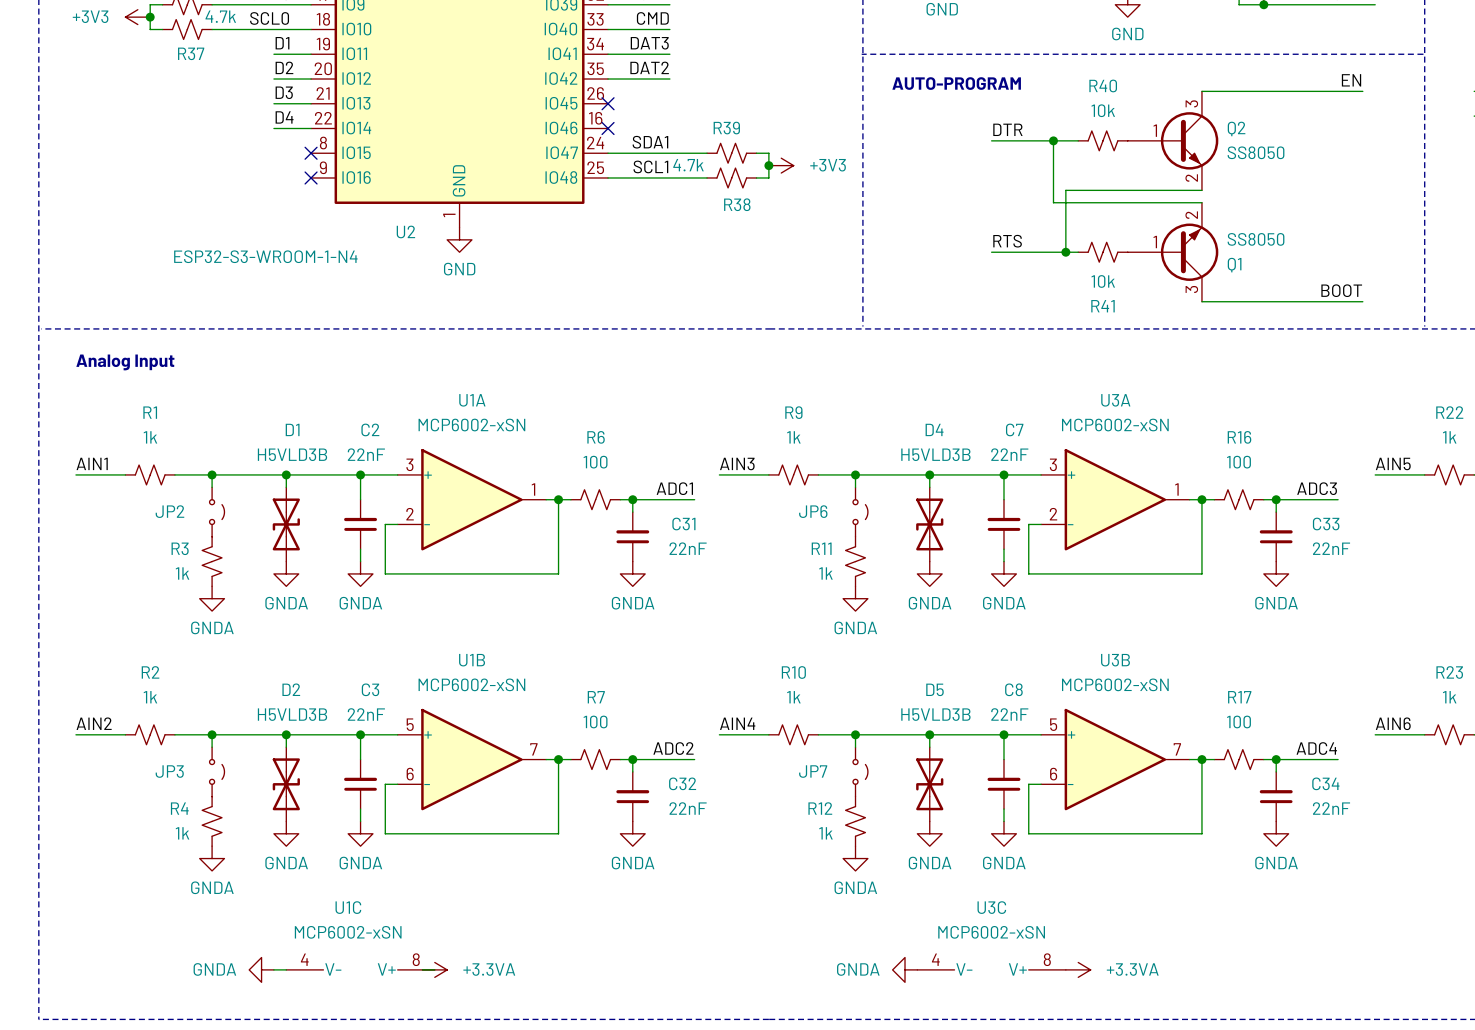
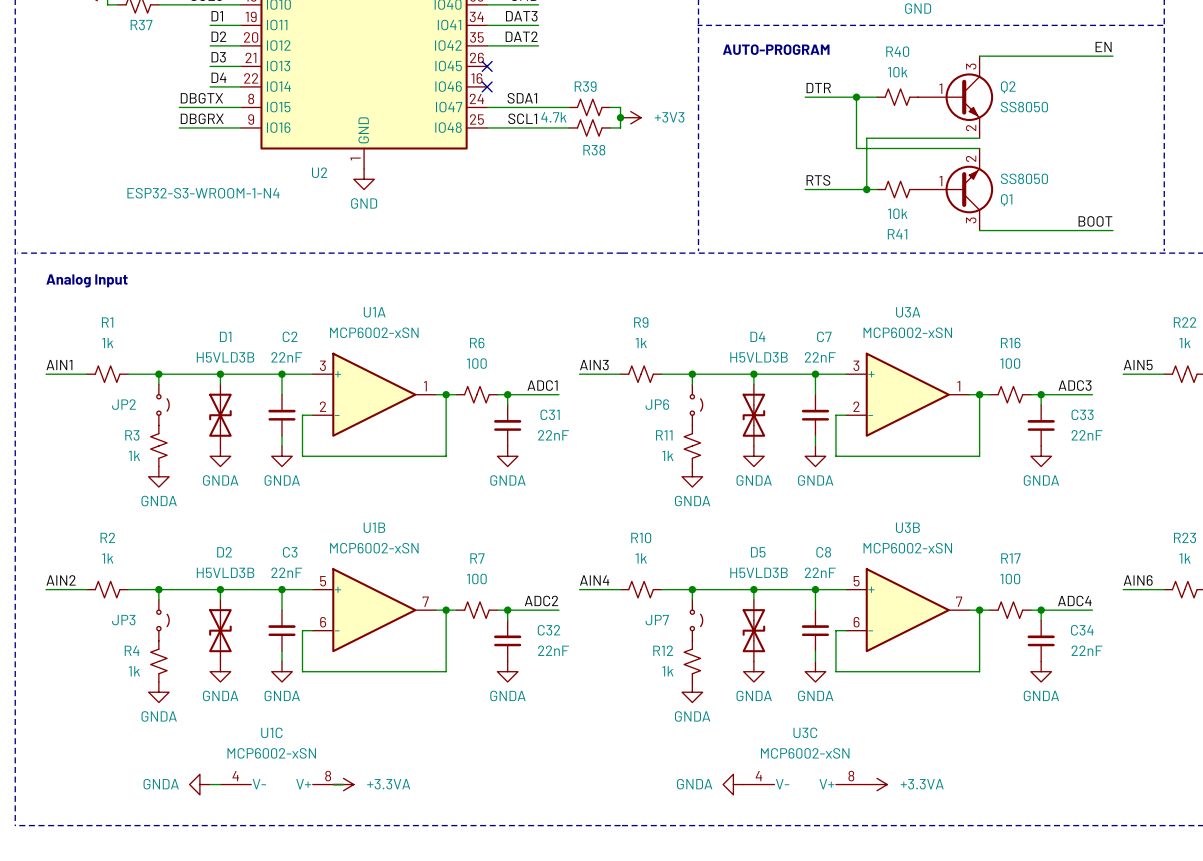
label: none -> DBGTX (201, 98)
wire: none -> (179, 107) (240, 107)
no-connect mark: (311, 153) -> none
label: none -> DBGRX (202, 118)
wire: none -> (179, 127) (240, 127)
no-connect mark: (311, 177) -> none

